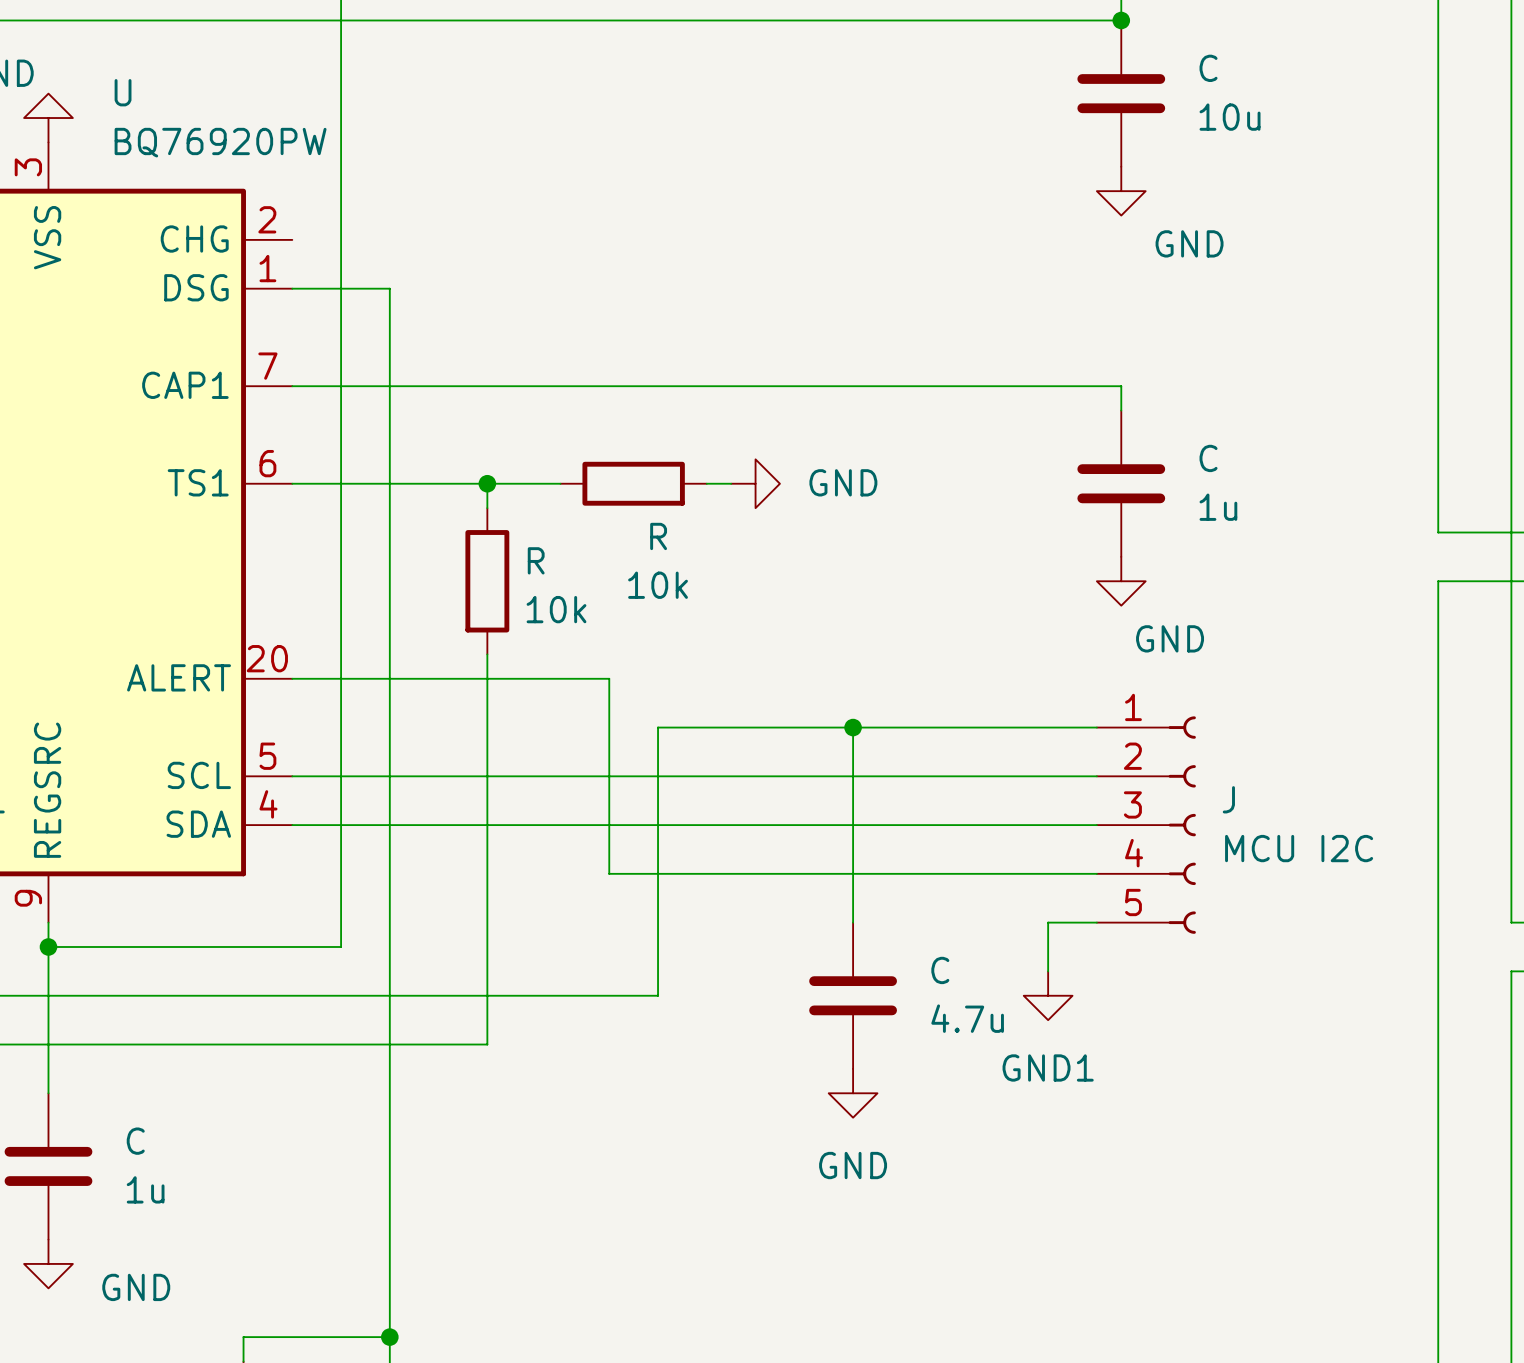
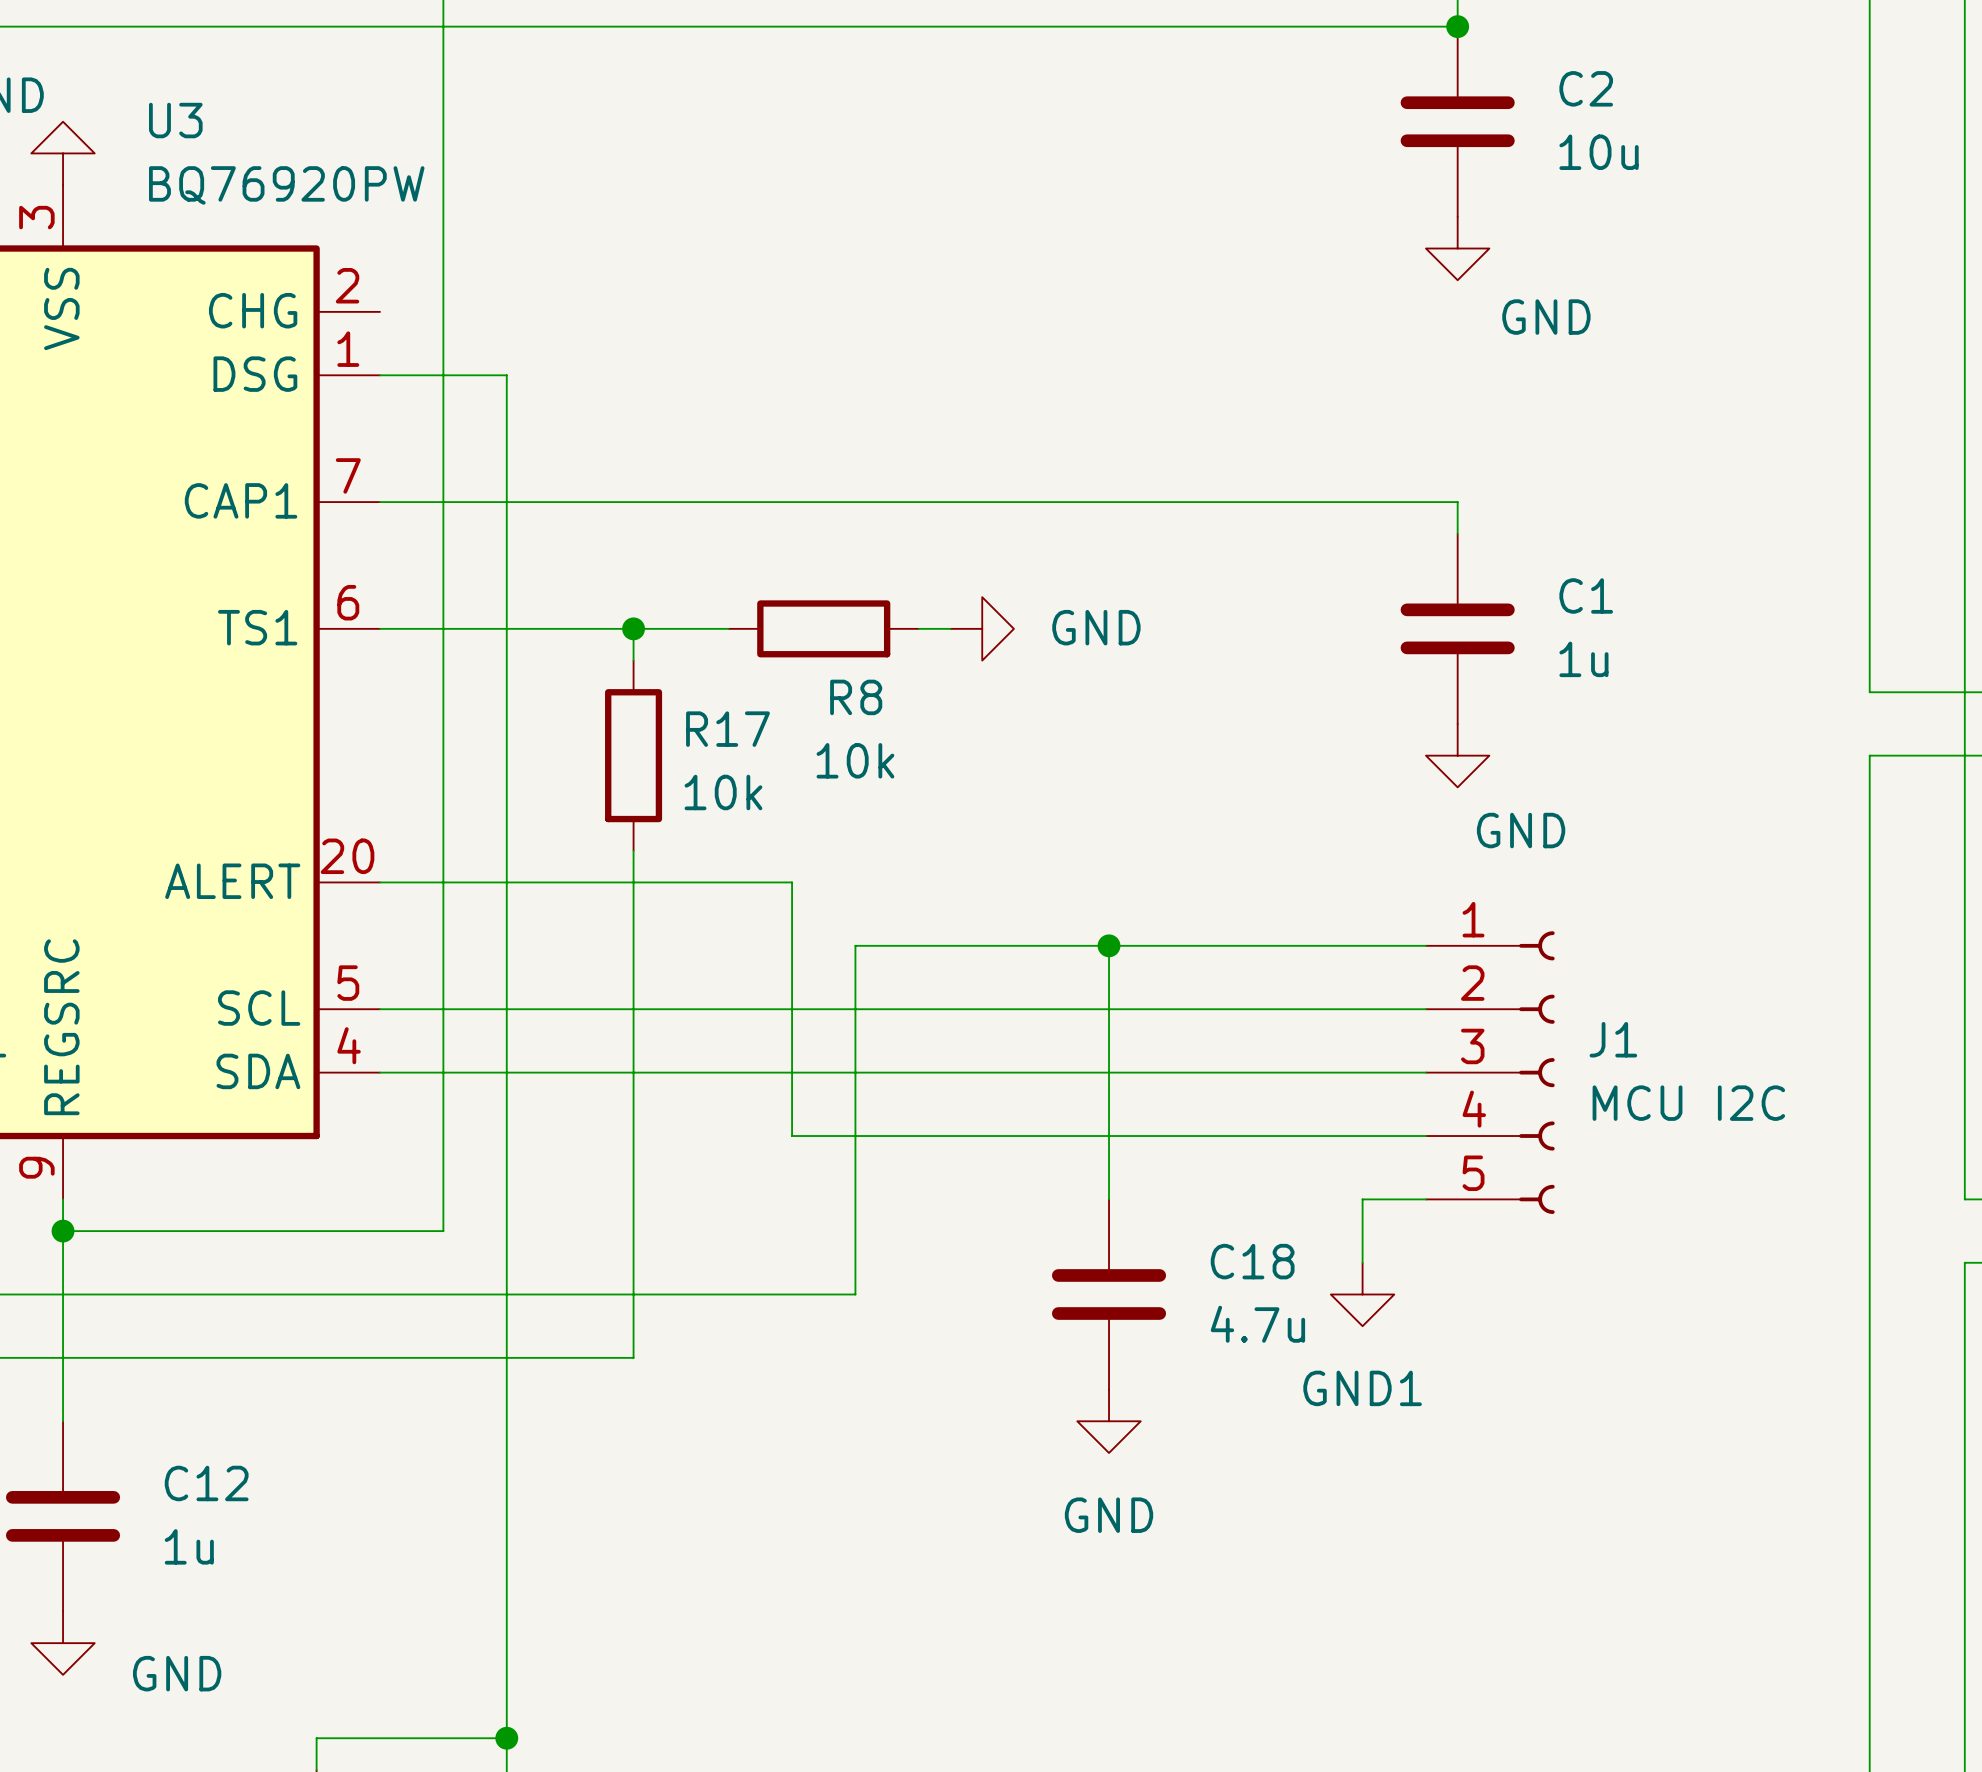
C name: C (1208, 68) -> C2 (1586, 88)
U name: U (123, 92) -> U3 (175, 120)
C name: C (1208, 458) -> C1 (1586, 595)
R name: R (658, 536) -> R8 (856, 697)
R name: R (536, 560) -> R17 (727, 729)
J name: J (1228, 799) -> J1 (1613, 1039)
C name: C (940, 970) -> C18 (1252, 1261)
C name: C (135, 1141) -> C12 (206, 1483)

